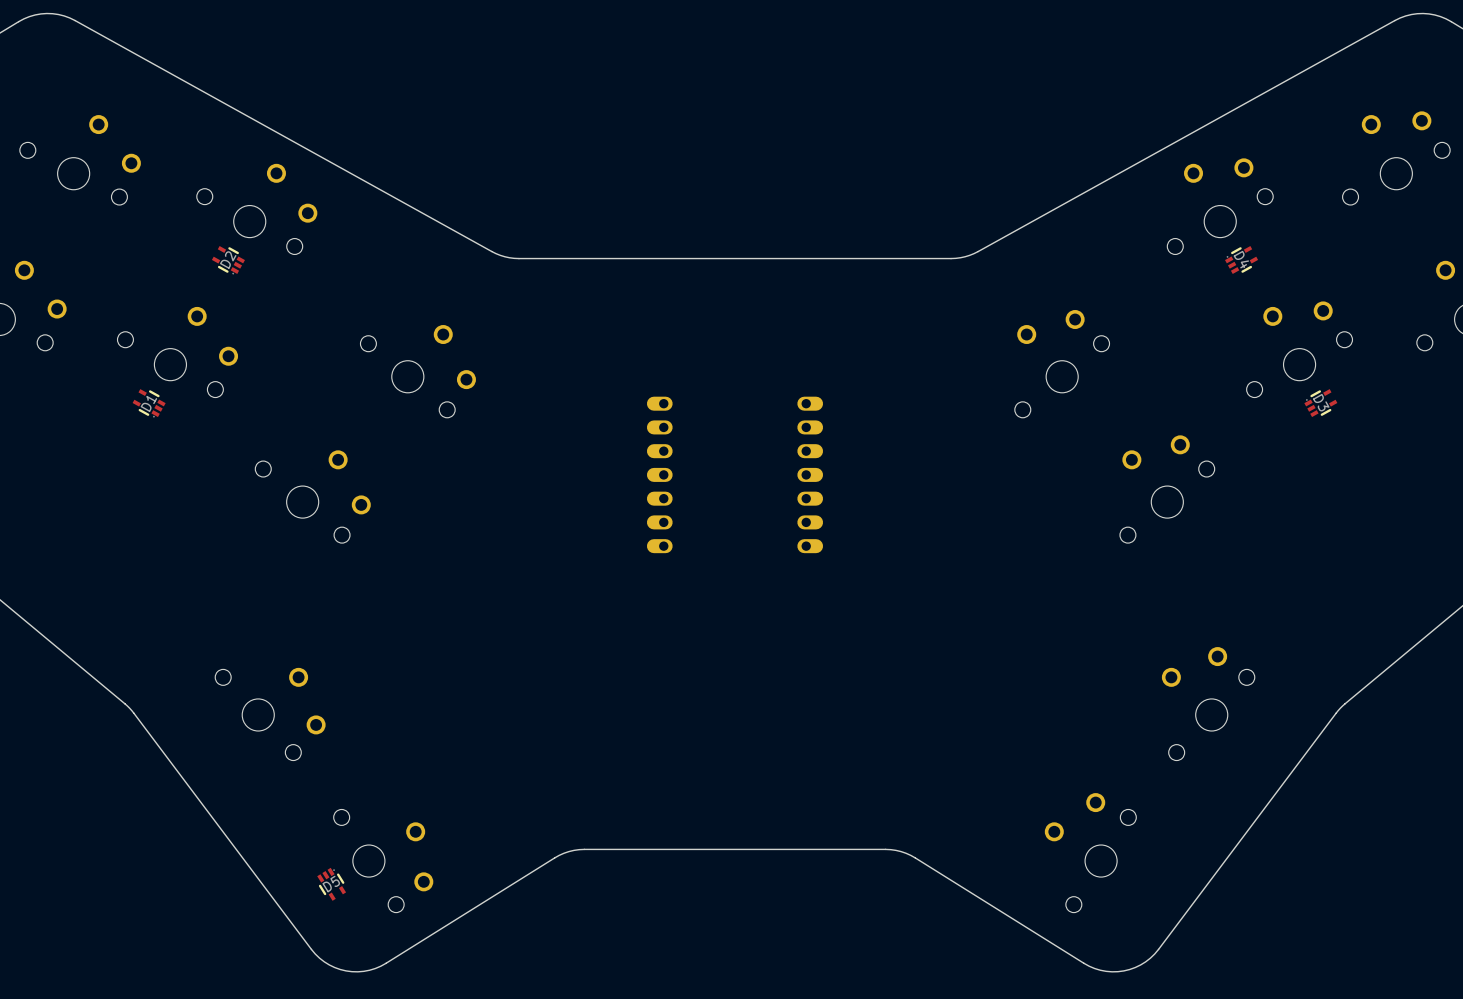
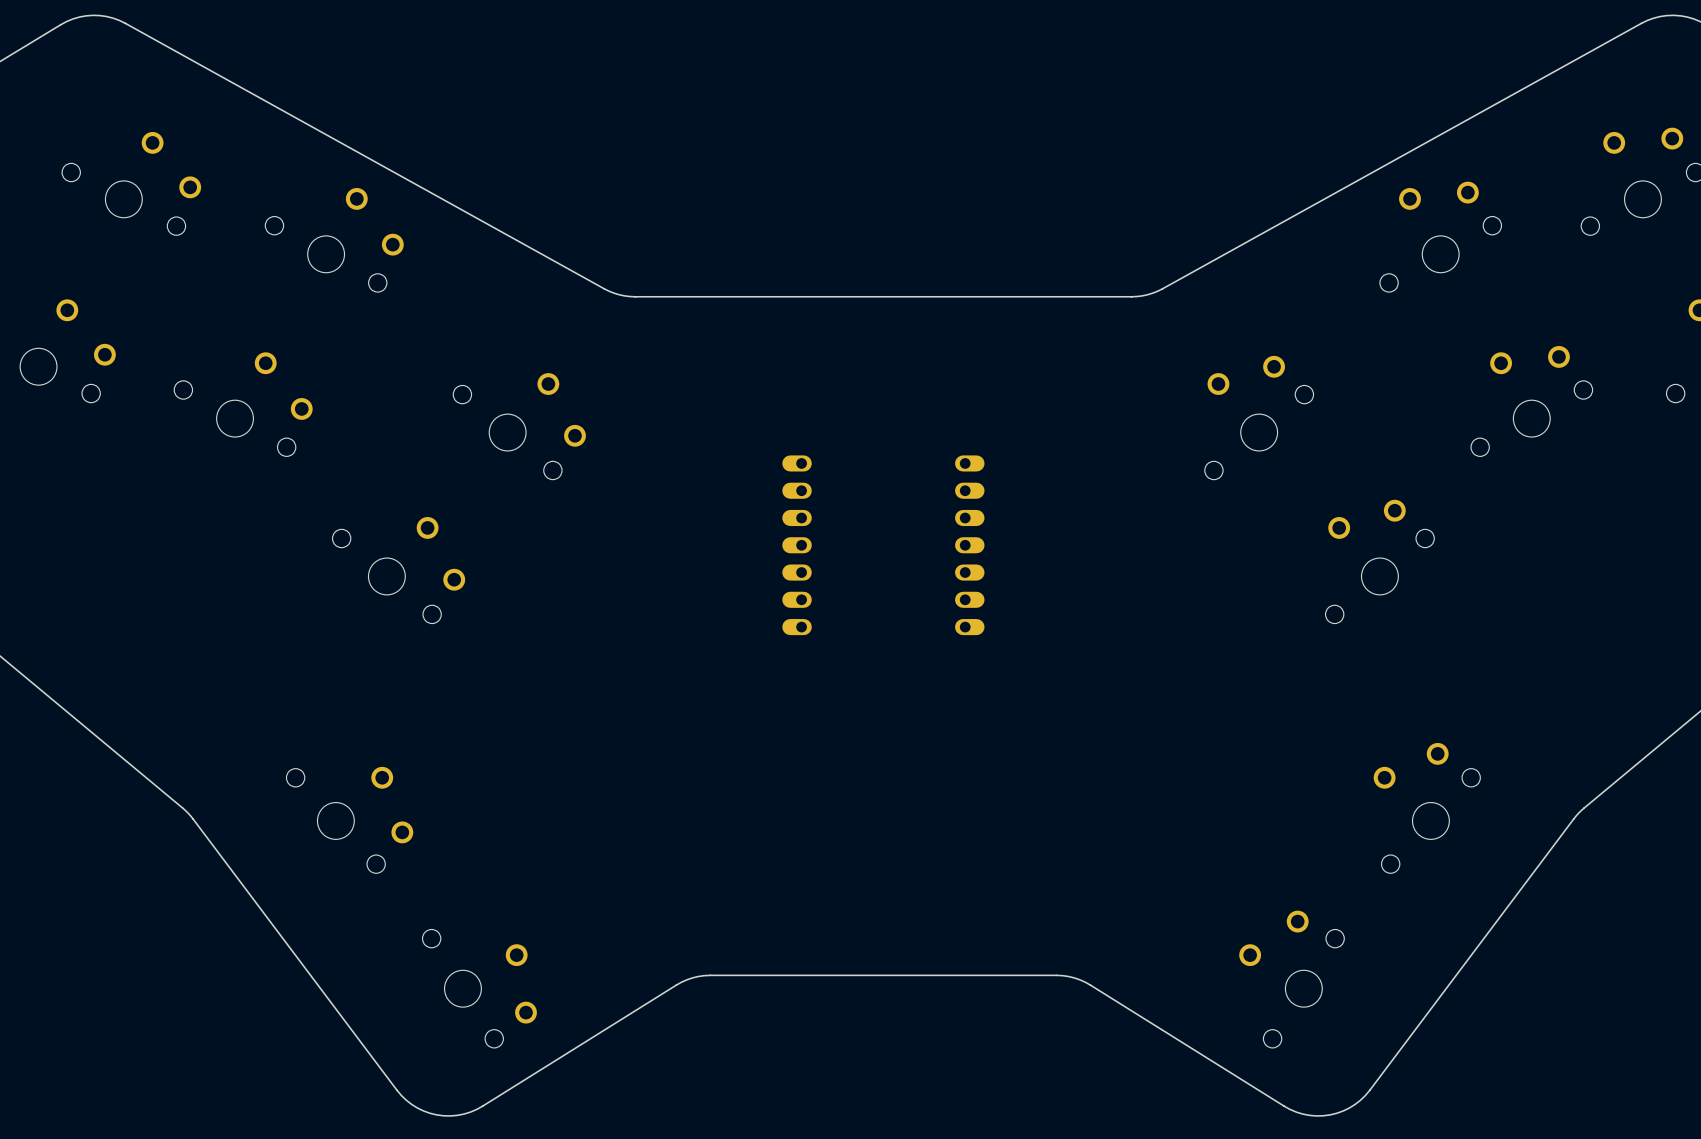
D2: (228, 260) -> none
D4: (1241, 260) -> none
D1: (149, 403) -> none
D3: (1320, 403) -> none
D5: (331, 884) -> none

